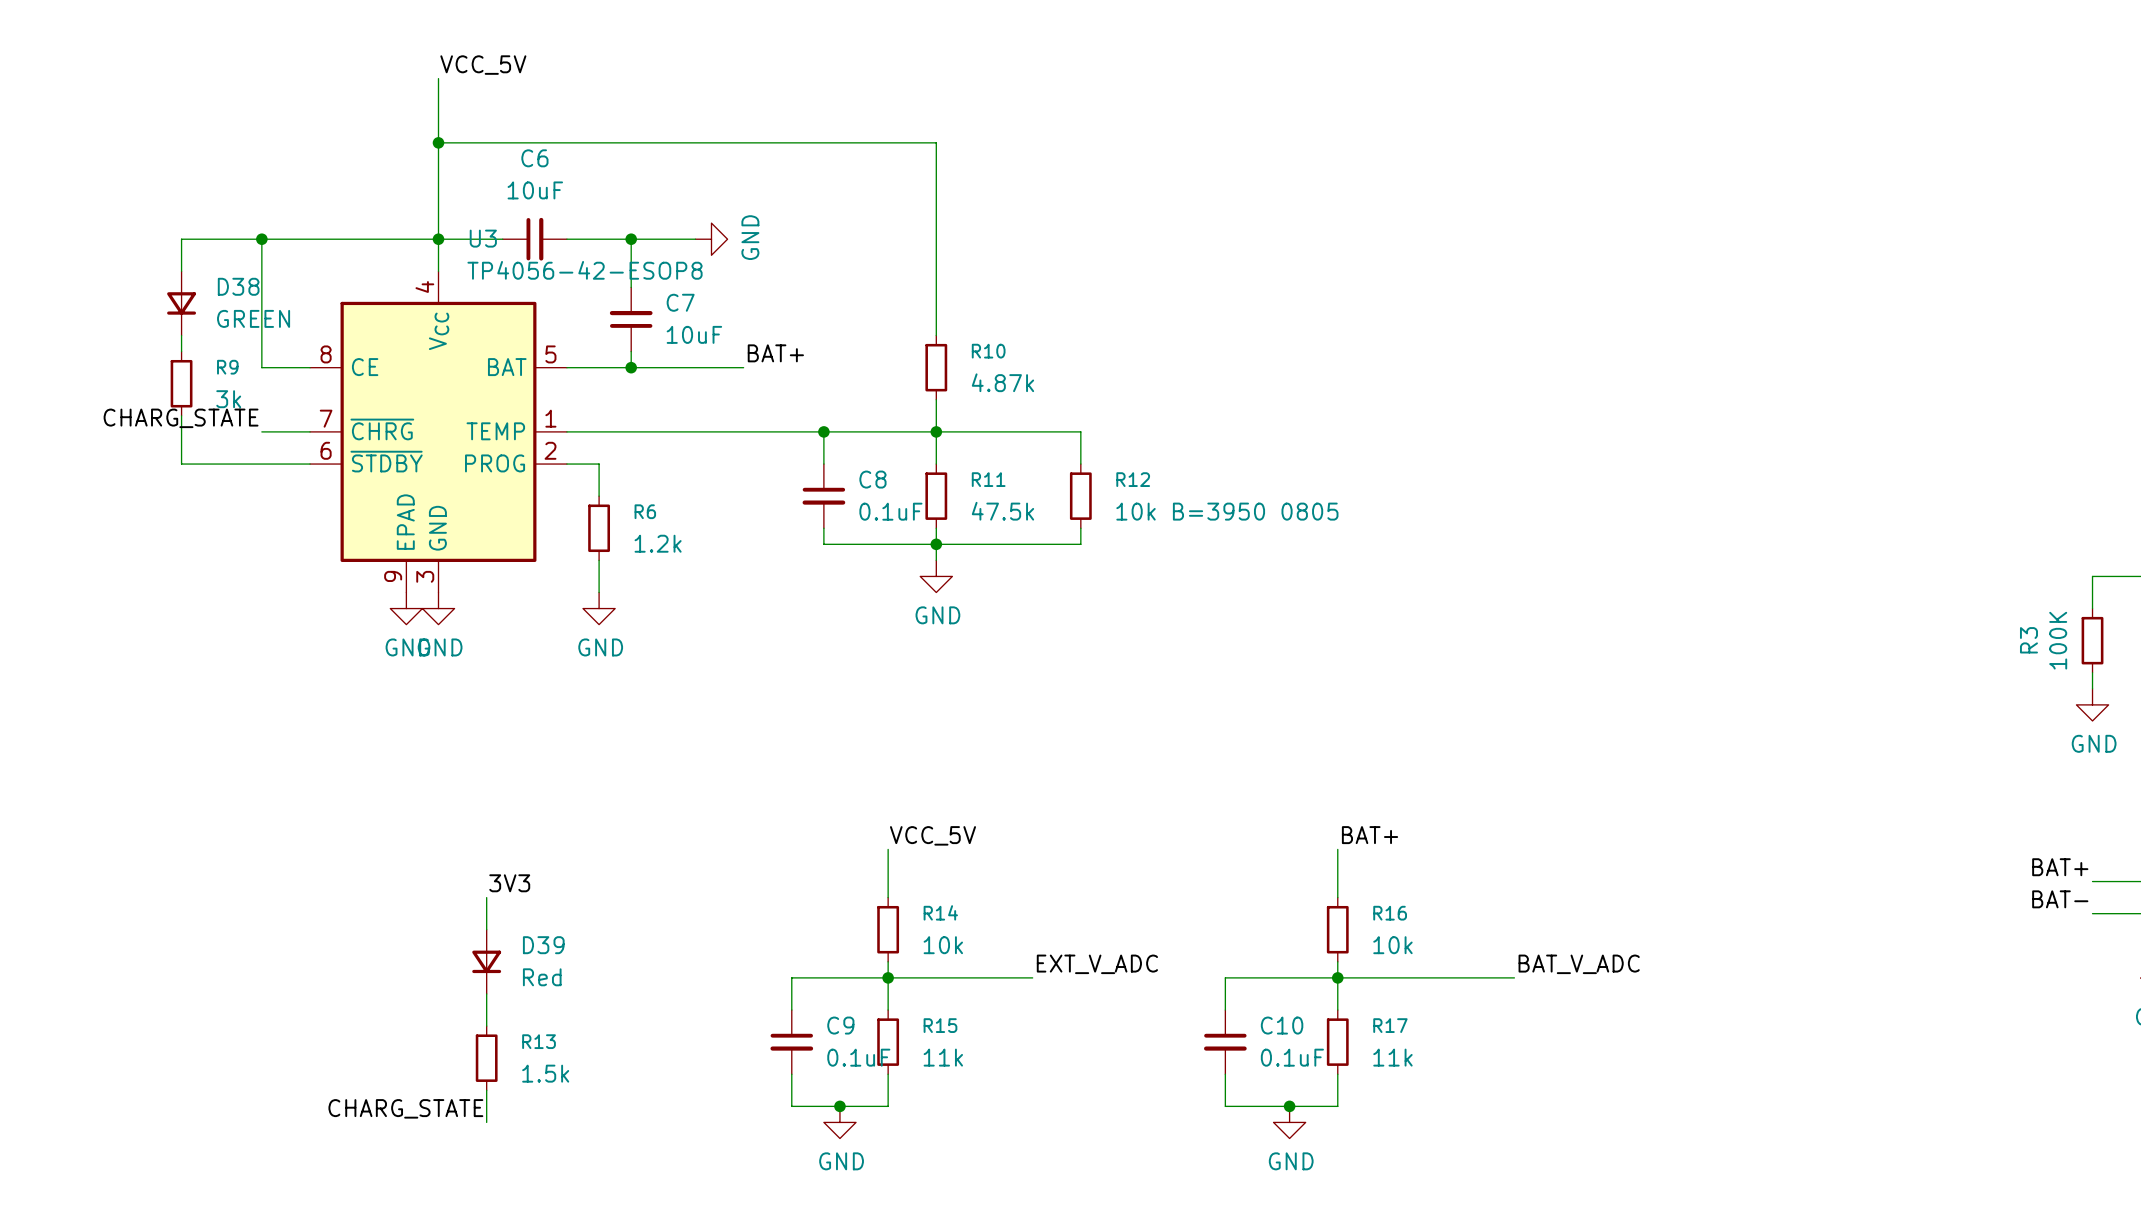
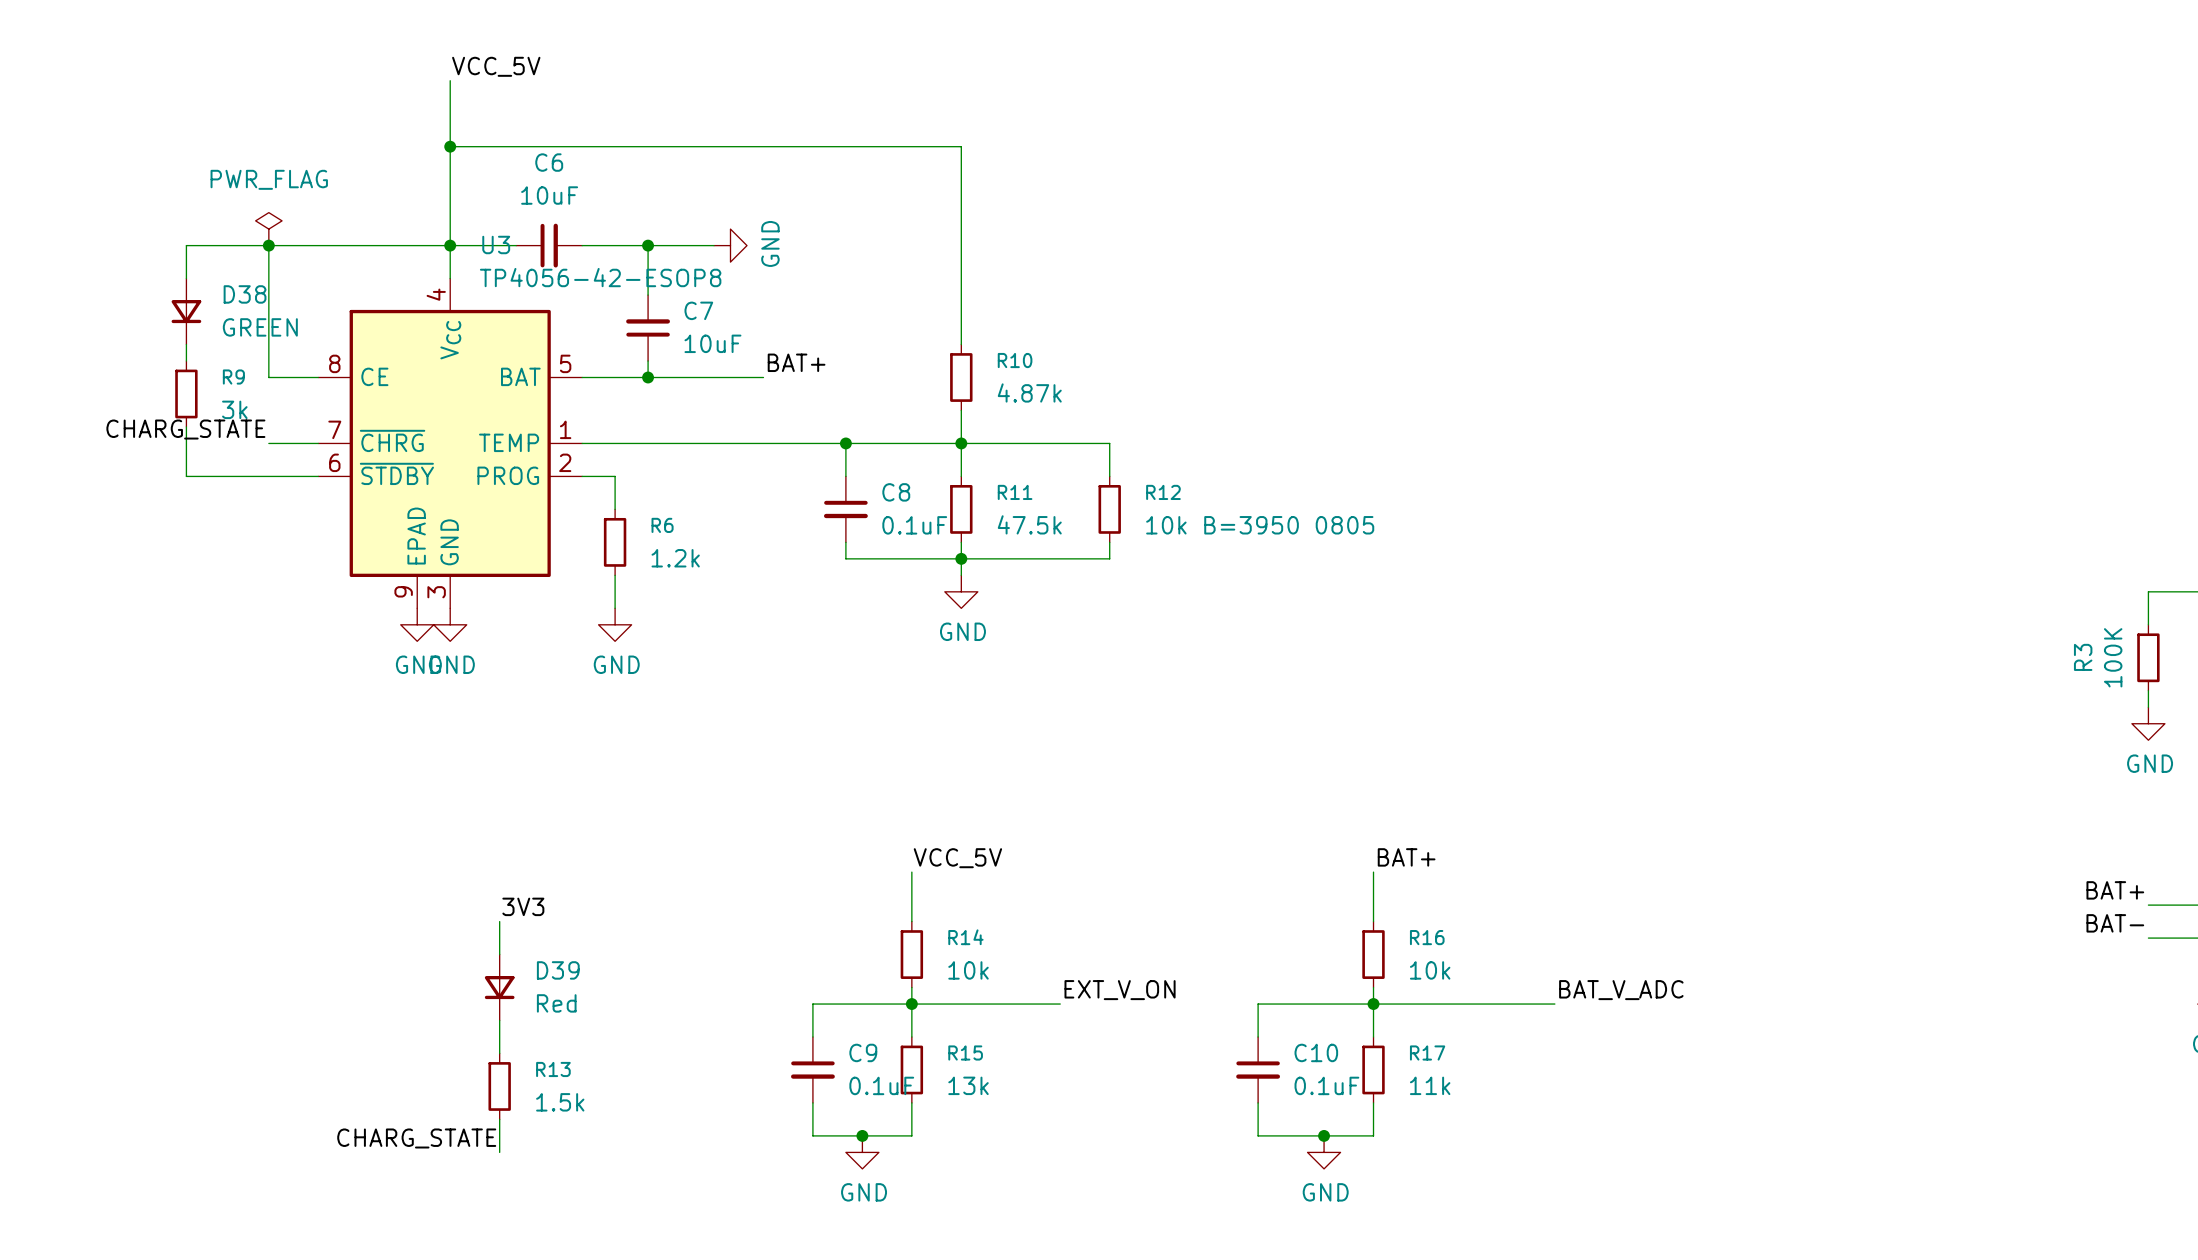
power symbol: none -> PWR_FLAG (268, 229)
label: EXT_V_ADC (1097, 964) -> EXT_V_ON (1120, 990)
R15 value: 11k (943, 1057) -> 13k (968, 1085)

